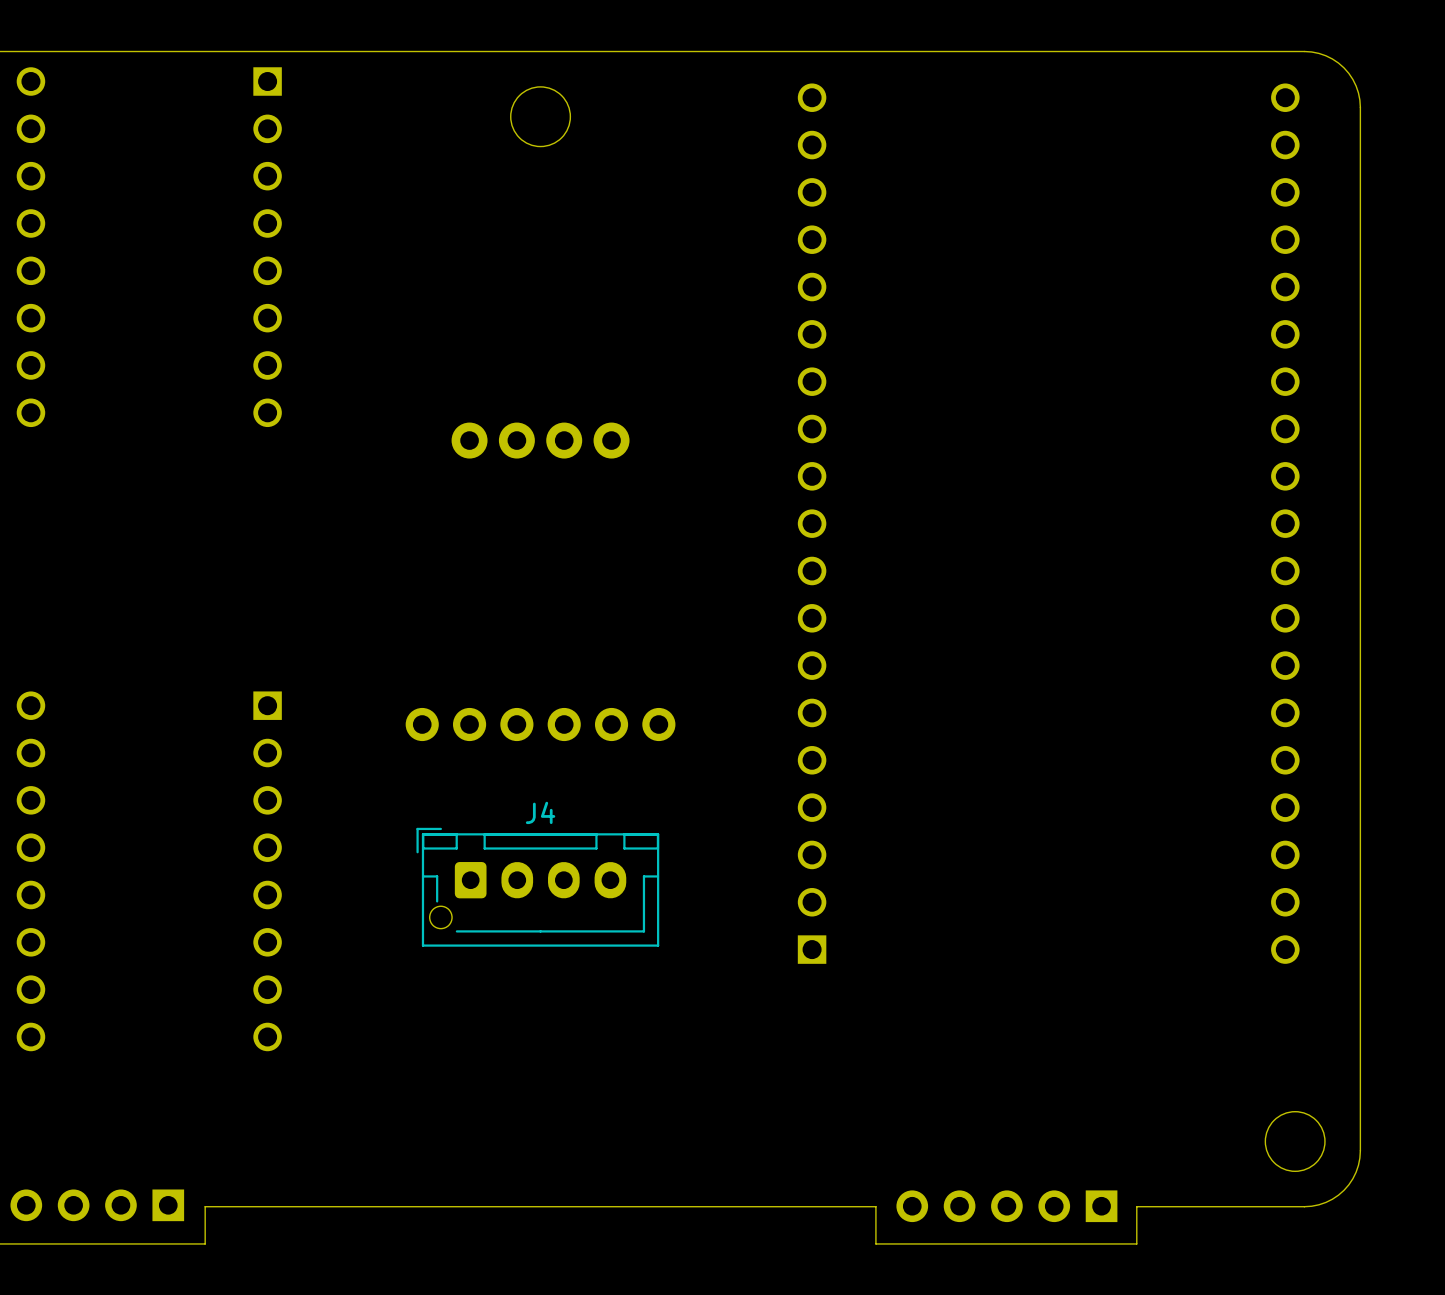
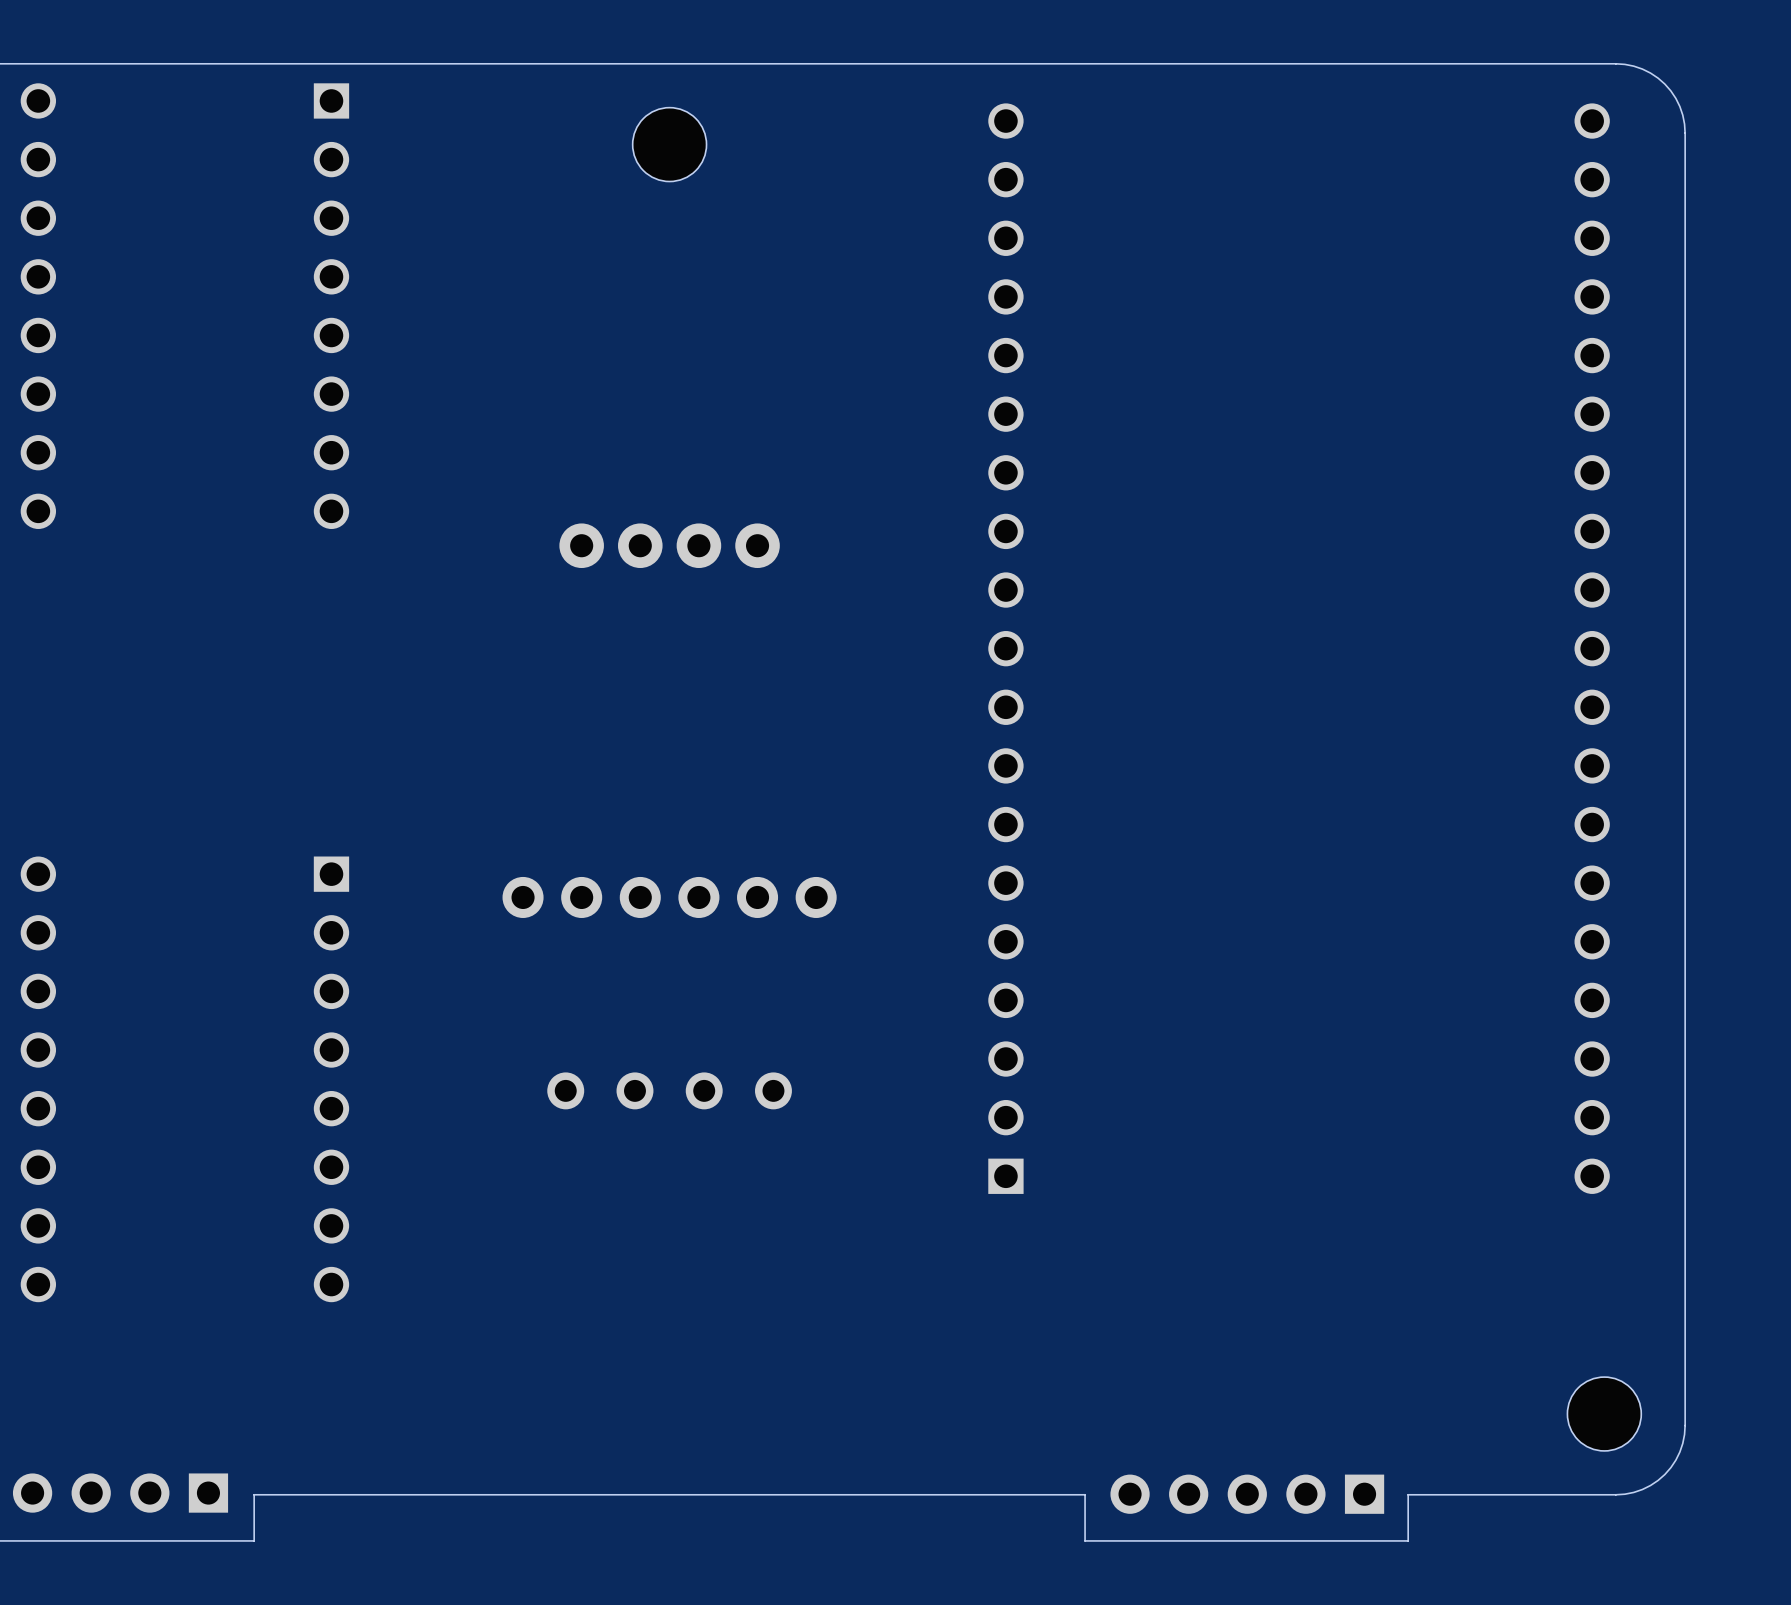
part: none -> (565, 1090)
part: none -> (634, 1090)
part: none -> (704, 1090)
part: none -> (773, 1090)
J4: (537, 887) -> none

